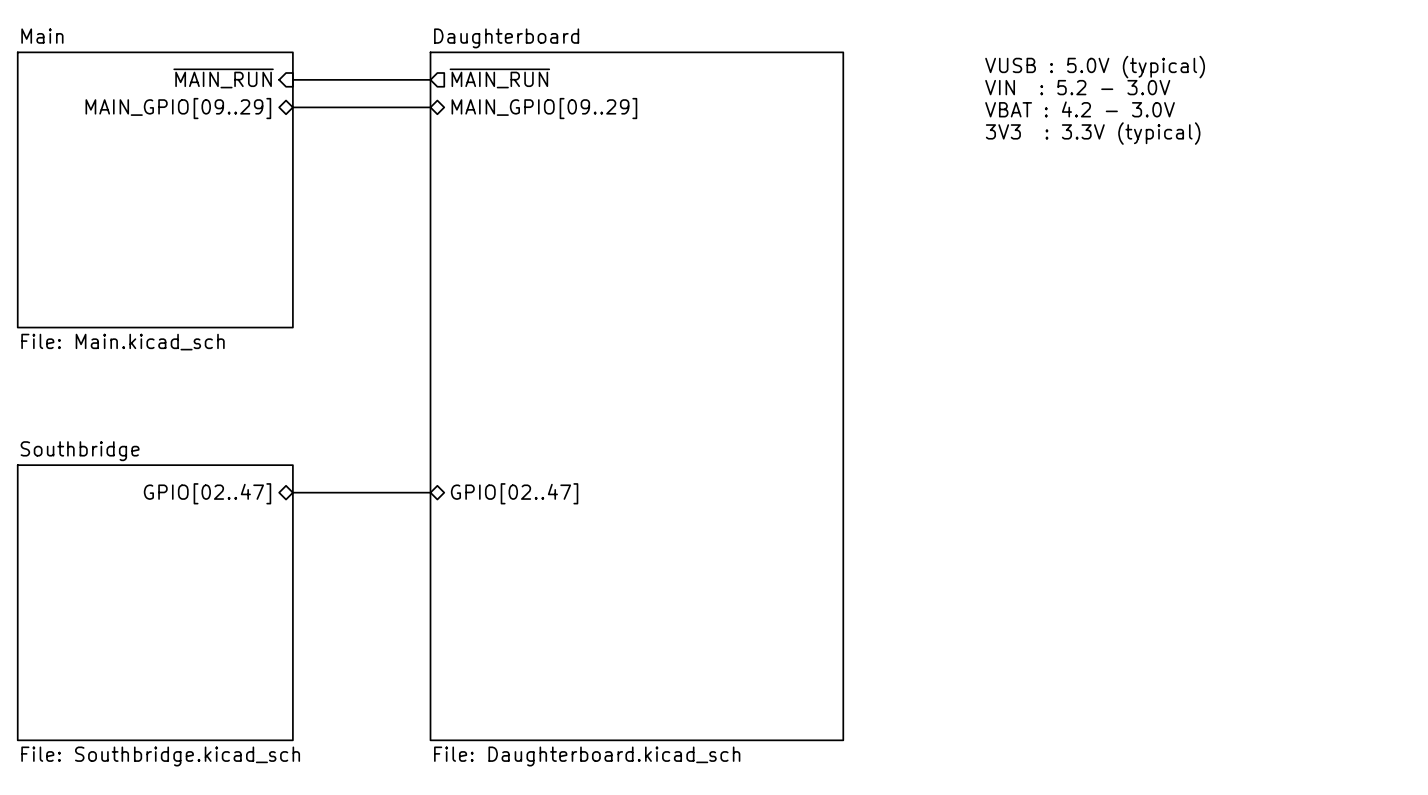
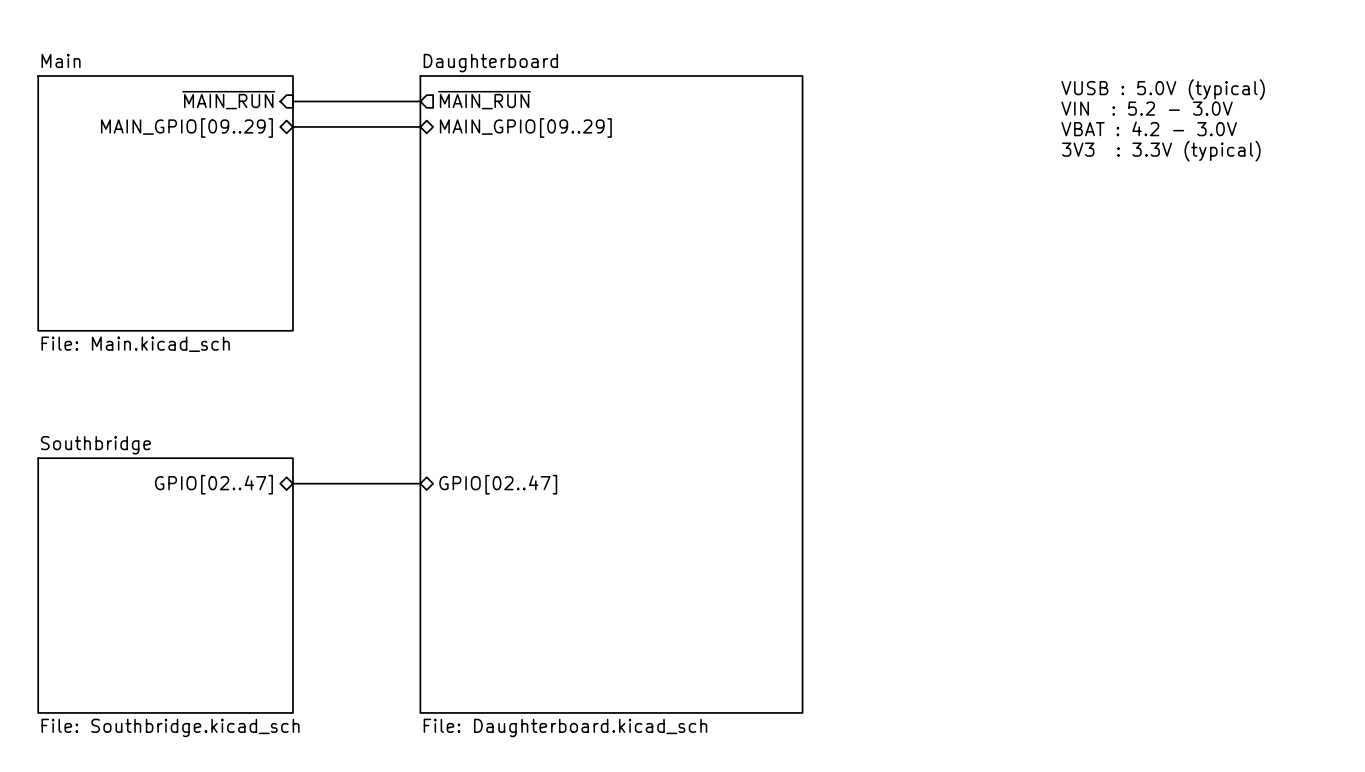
text position: VUSB : 5.0V (typical) (1095, 67) -> VUSB : 5.0V (typical) (1163, 89)
text position: VIN : 5.2 - 3.0V (1077, 87) -> VIN : 5.2 - 3.0V (1147, 108)
text position: VBAT : 4.2 - 3.0V (1080, 109) -> VBAT : 4.2 - 3.0V (1149, 128)
text position: 3V3 : 3.3V (typical) (1093, 133) -> 3V3 : 3.3V (typical) (1161, 151)

